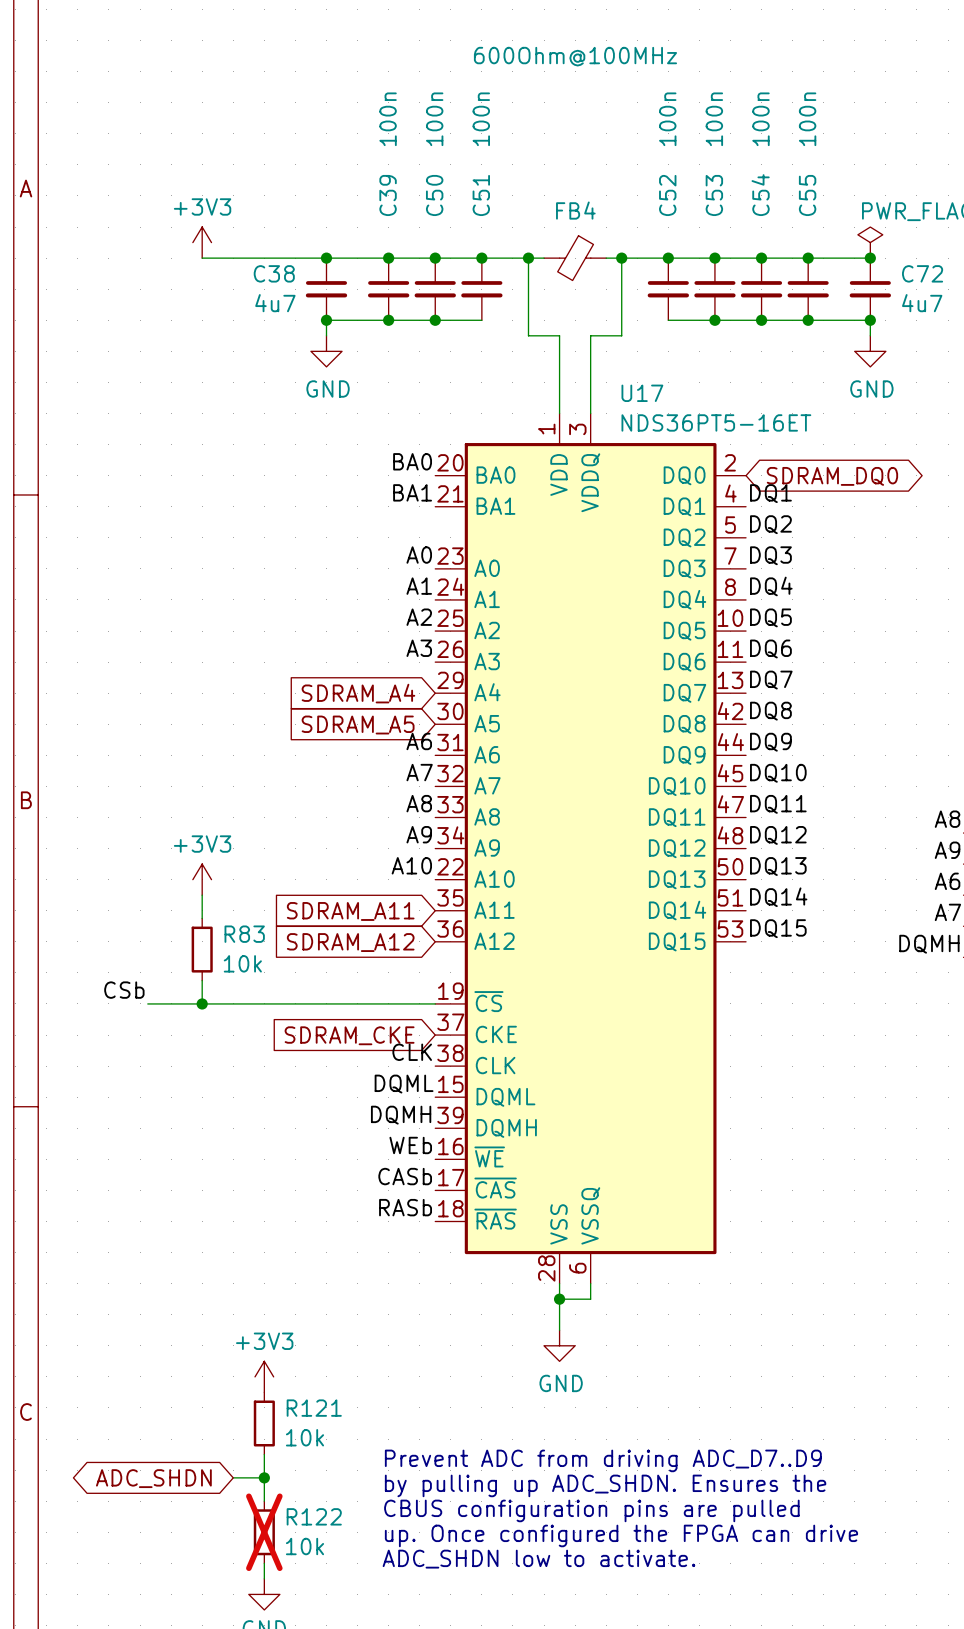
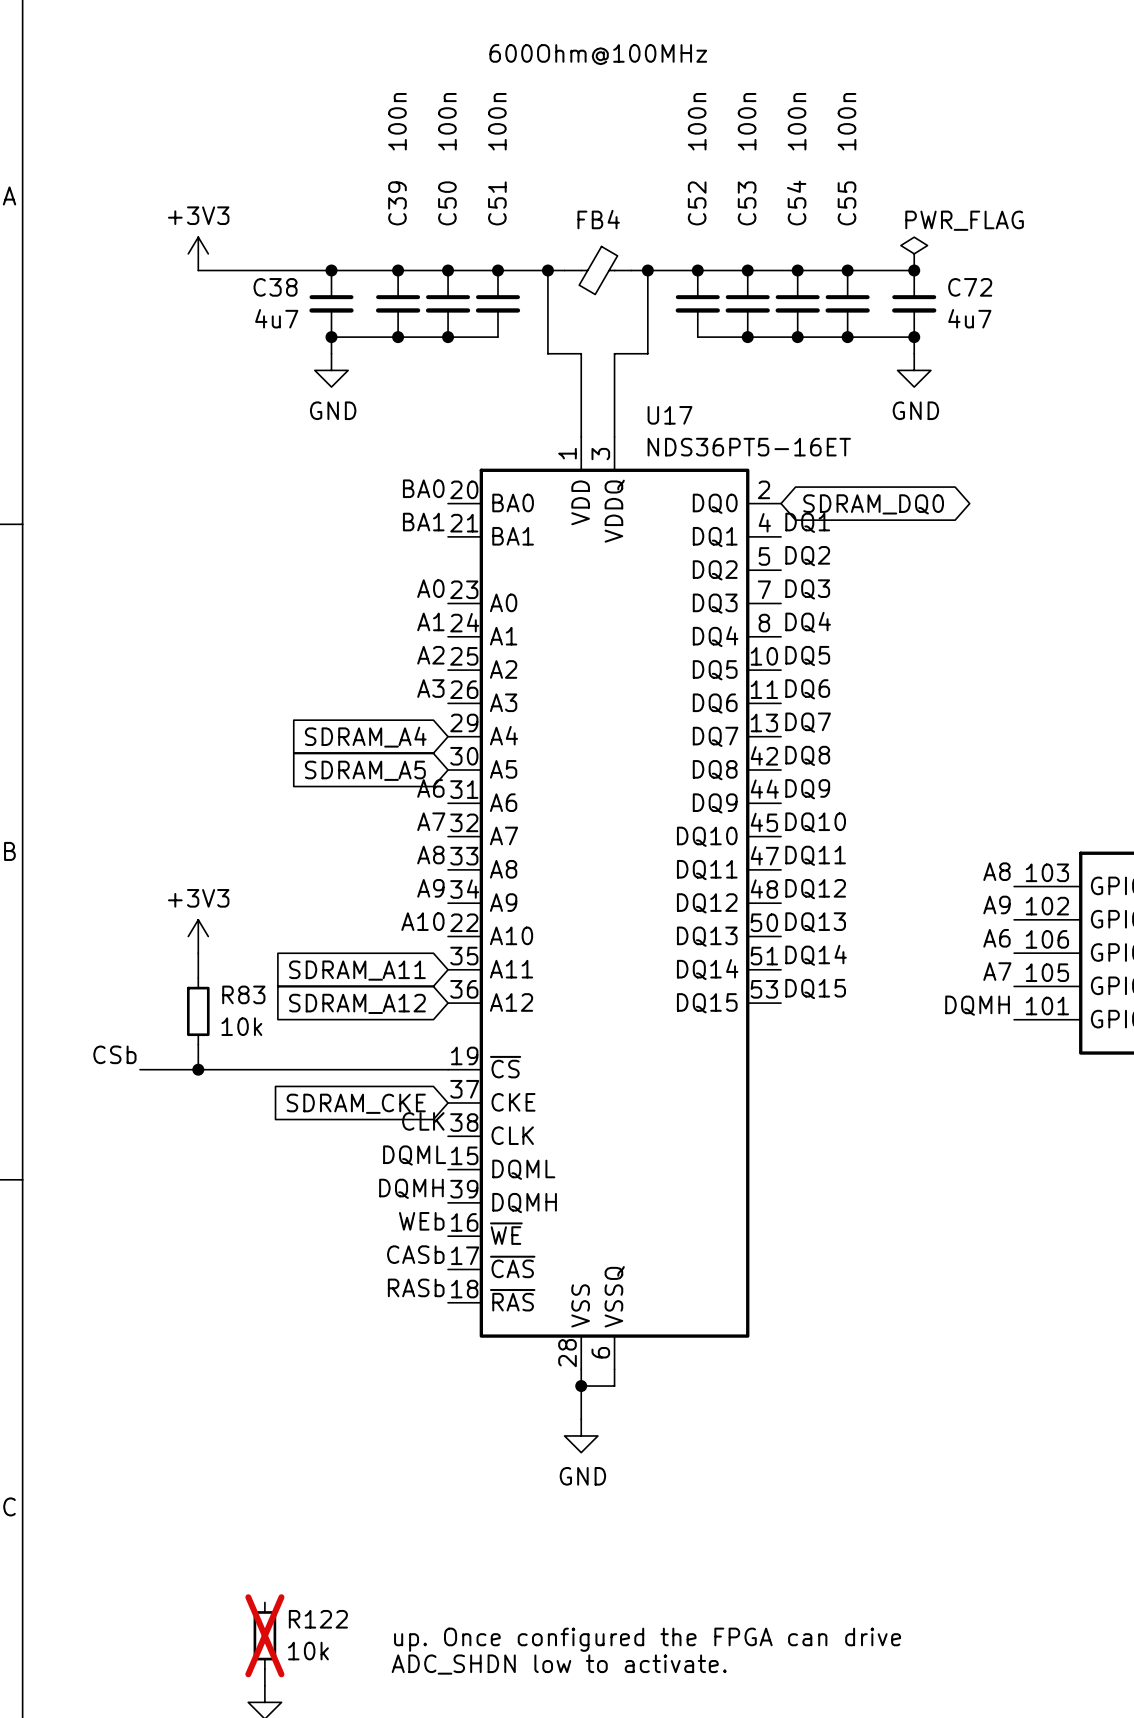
power symbol: +3V3 (264, 1376) -> none
R121: 10k (264, 1423) -> none
wire: (264, 1454) (264, 1501) -> none
text: Prevent ADC from driving ADC_D7..D9 (603, 1460) -> none
wire: (233, 1477) (264, 1477) -> none
junction: (264, 1477) -> none
global label: ADC_SHDN (153, 1478) -> none
text: by pulling up ADC_SHDN. Ensures the (605, 1485) -> none
text: CBUS configuration pins are pulled (591, 1510) -> none

